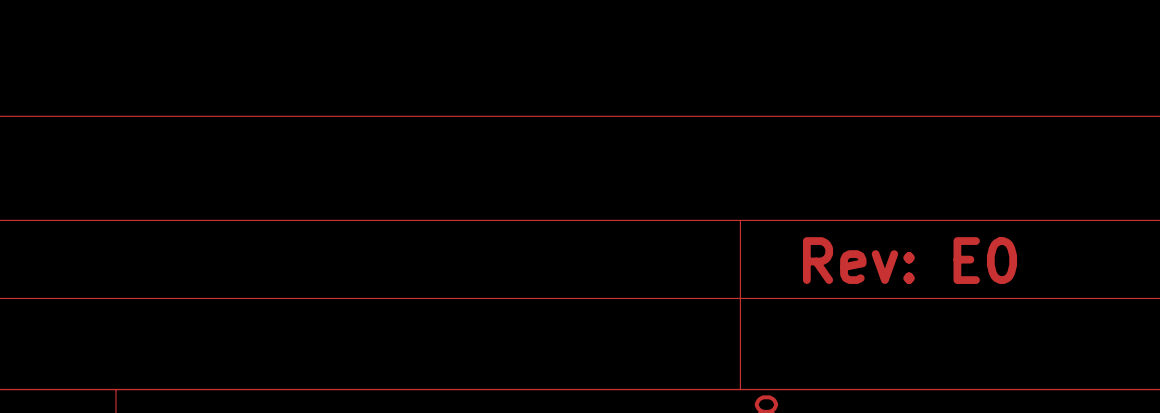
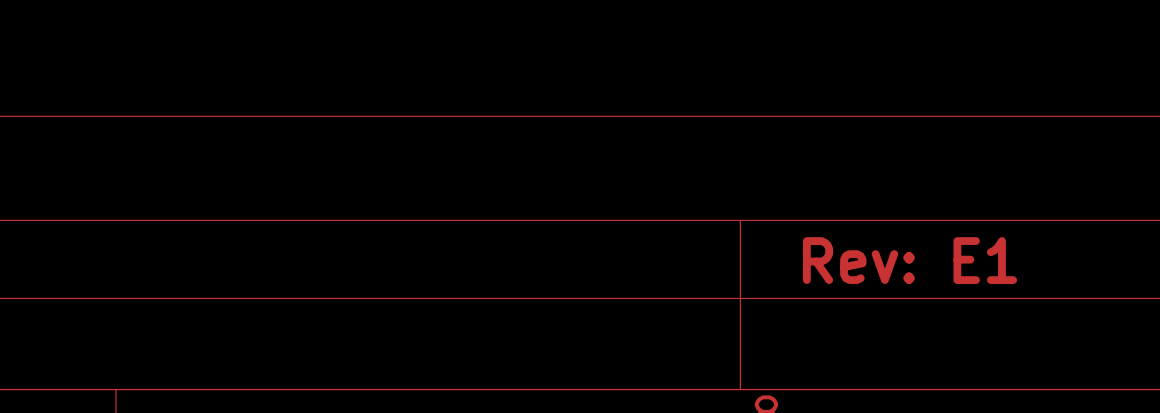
title block: Rev: E0 (910, 260) -> Rev: E1 (910, 260)

